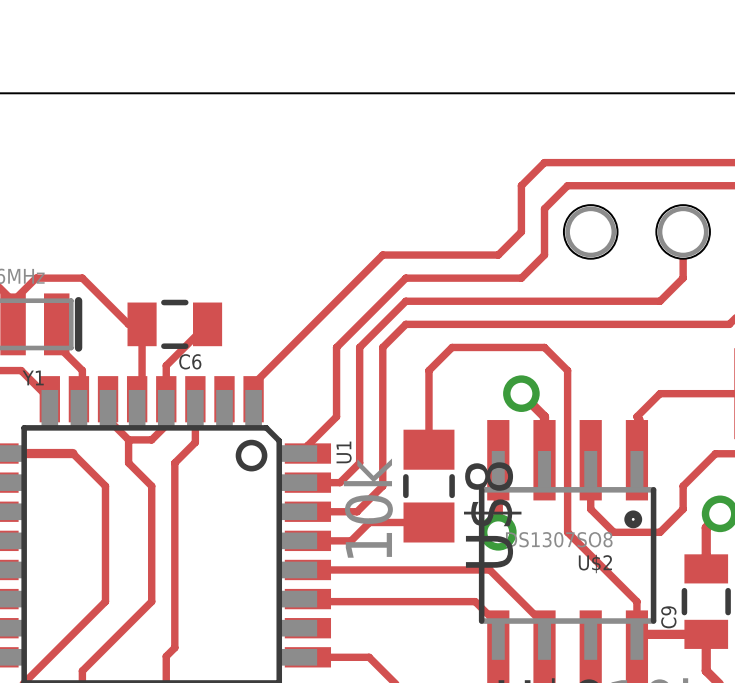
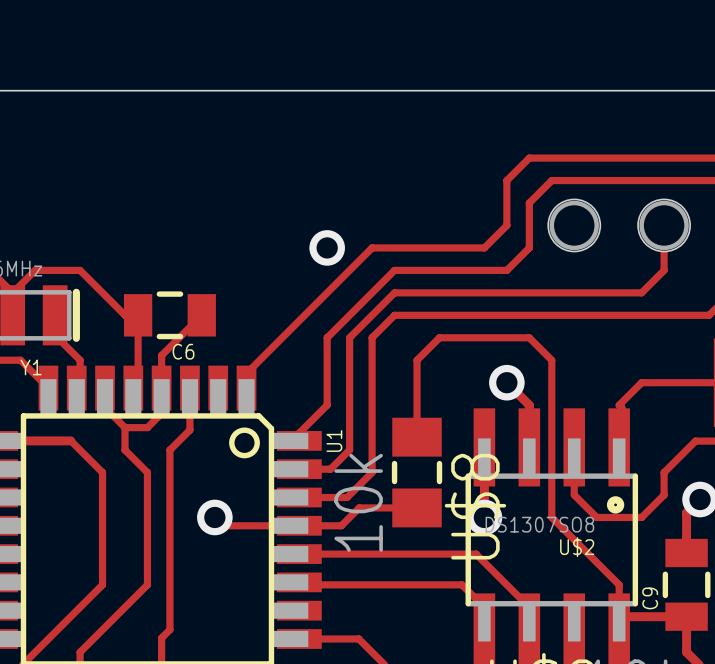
via: none -> (327, 247)
track: none -> (214, 517) (223, 525) (299, 525)
via: none -> (214, 517)

